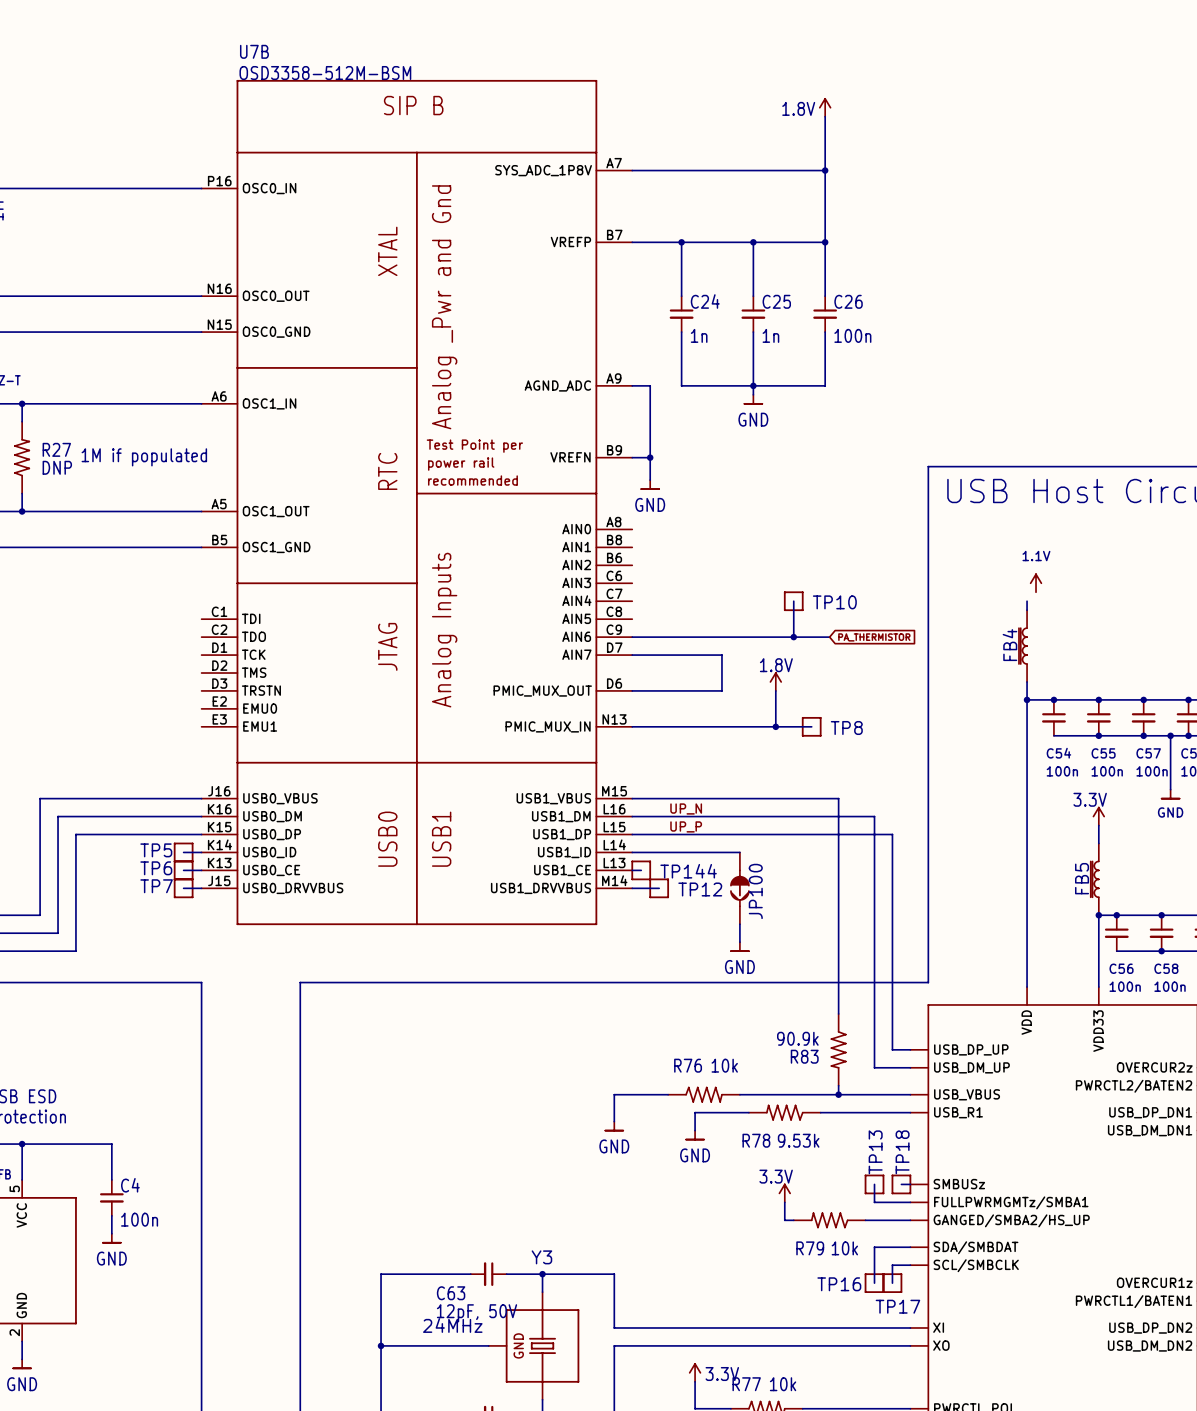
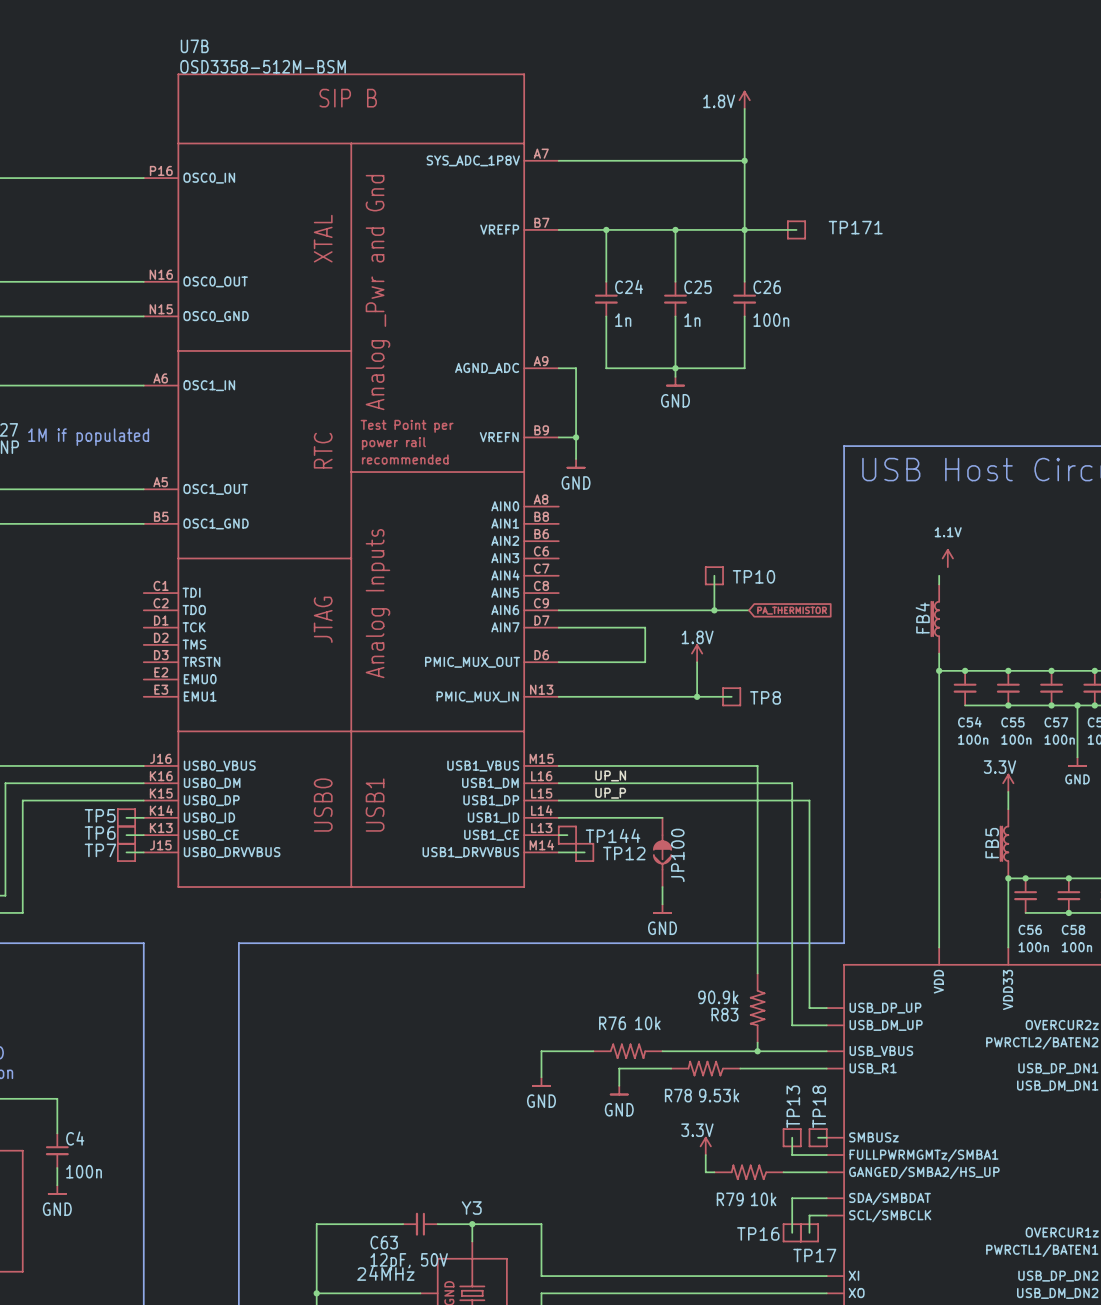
wire: none -> (744, 229) (796, 229)
TP171: none -> (796, 229)

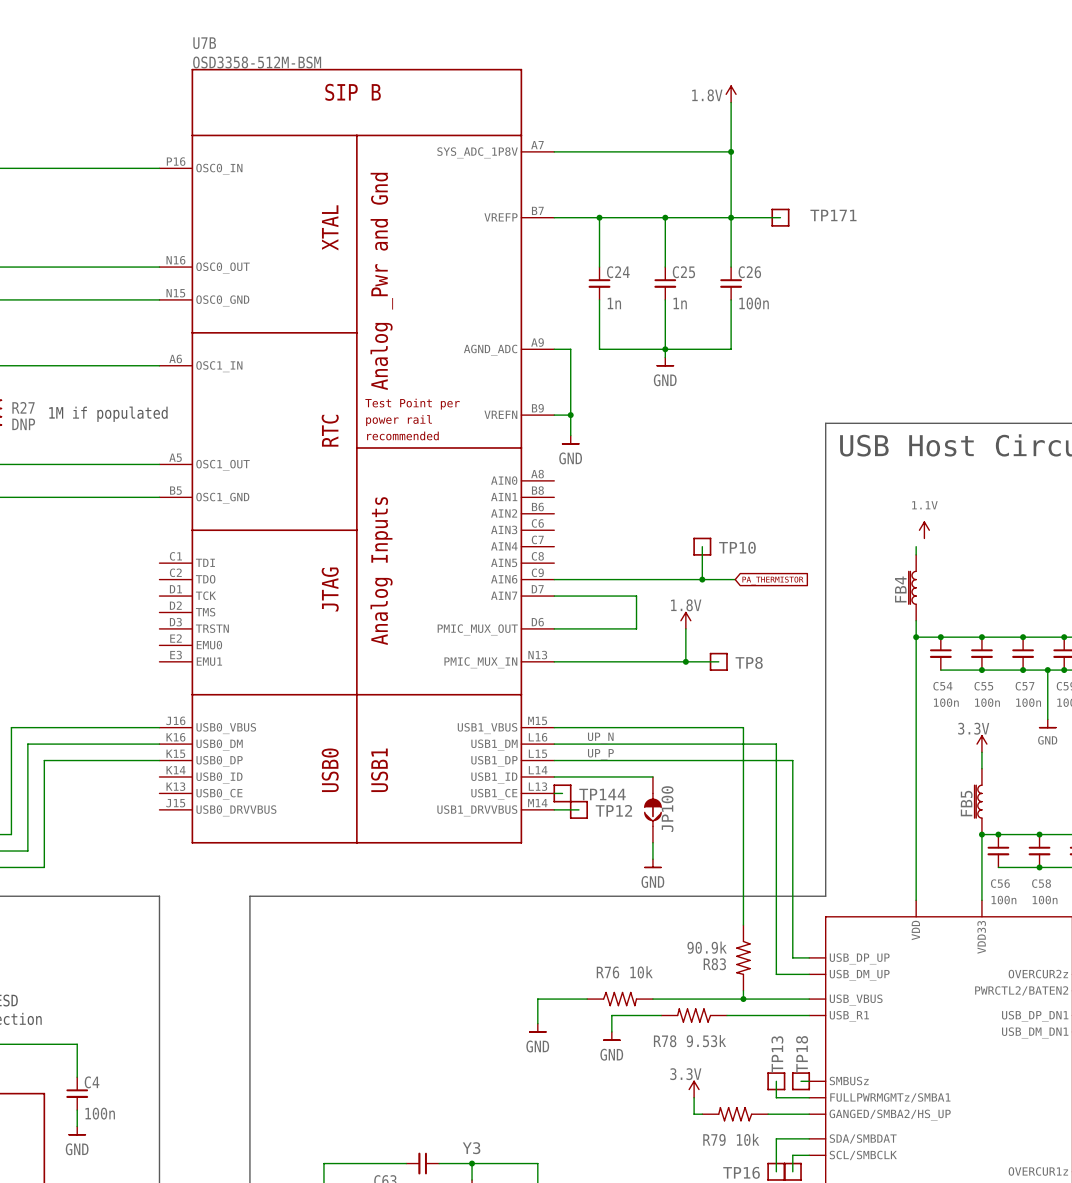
wire: (126, 817) (143, 817) -> none
TP5: (126, 817) -> none
wire: (126, 835) (143, 835) -> none
TP6: (126, 835) -> none
wire: (126, 852) (143, 852) -> none
TP7: (126, 852) -> none

